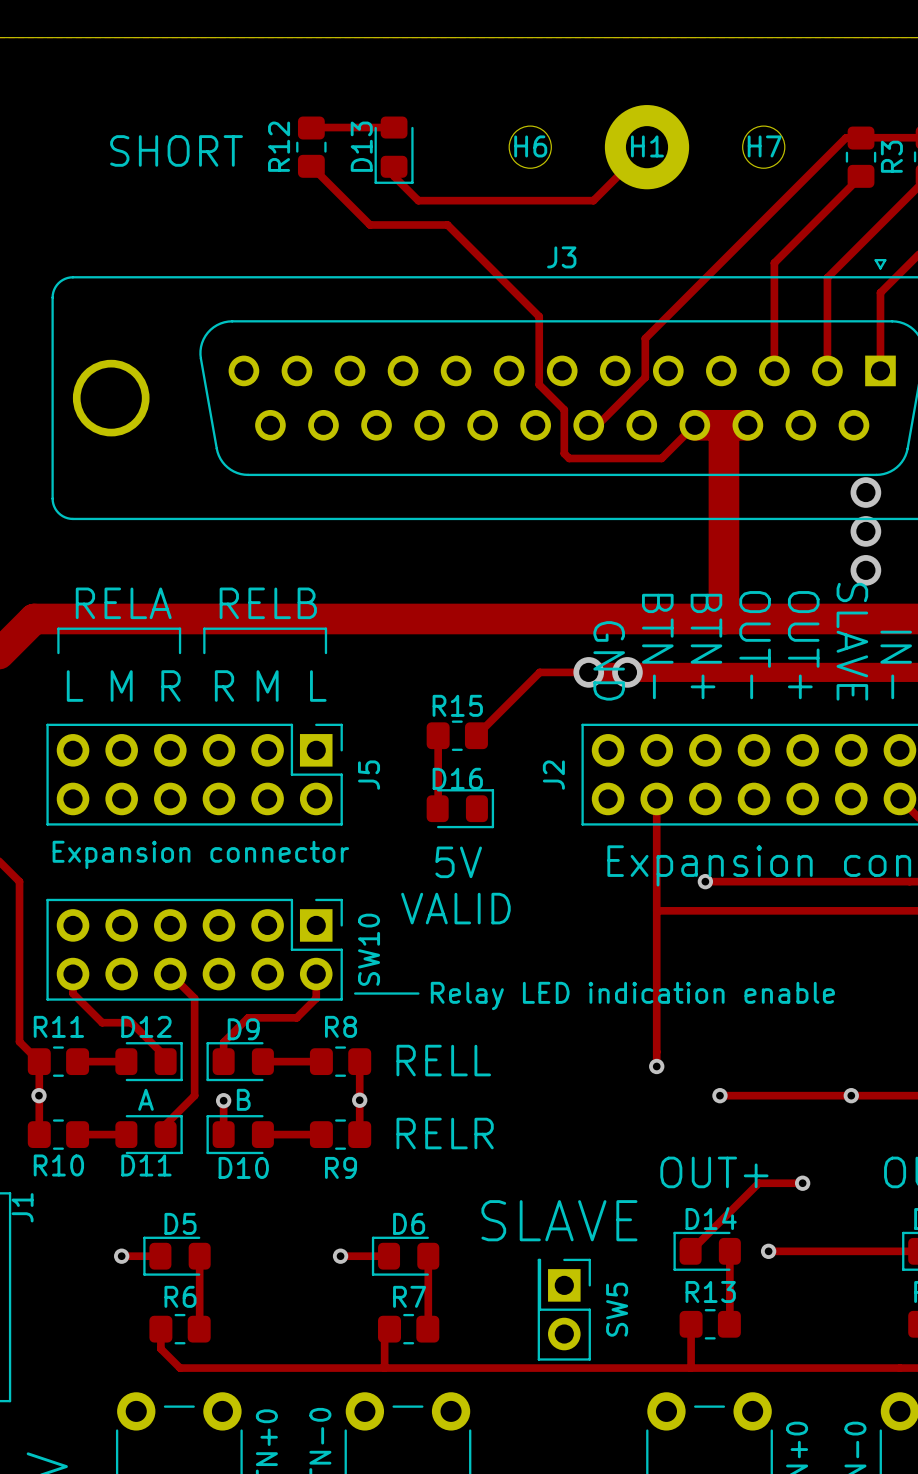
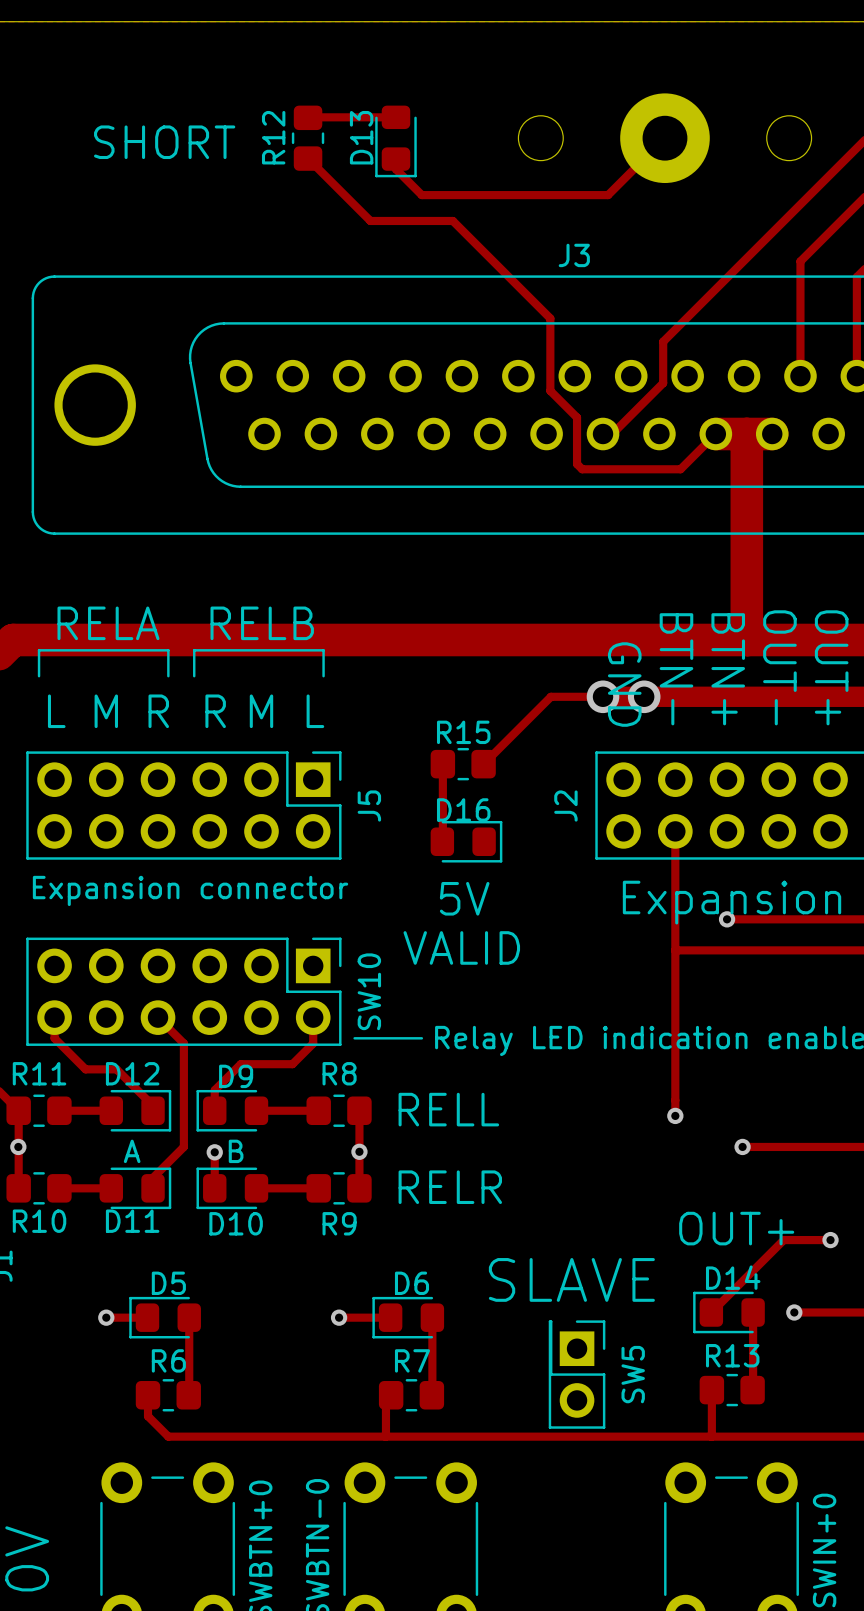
H6 name: H6 (530, 146) -> none
H1 name: H1 (647, 146) -> none
H7 name: H7 (764, 146) -> none

